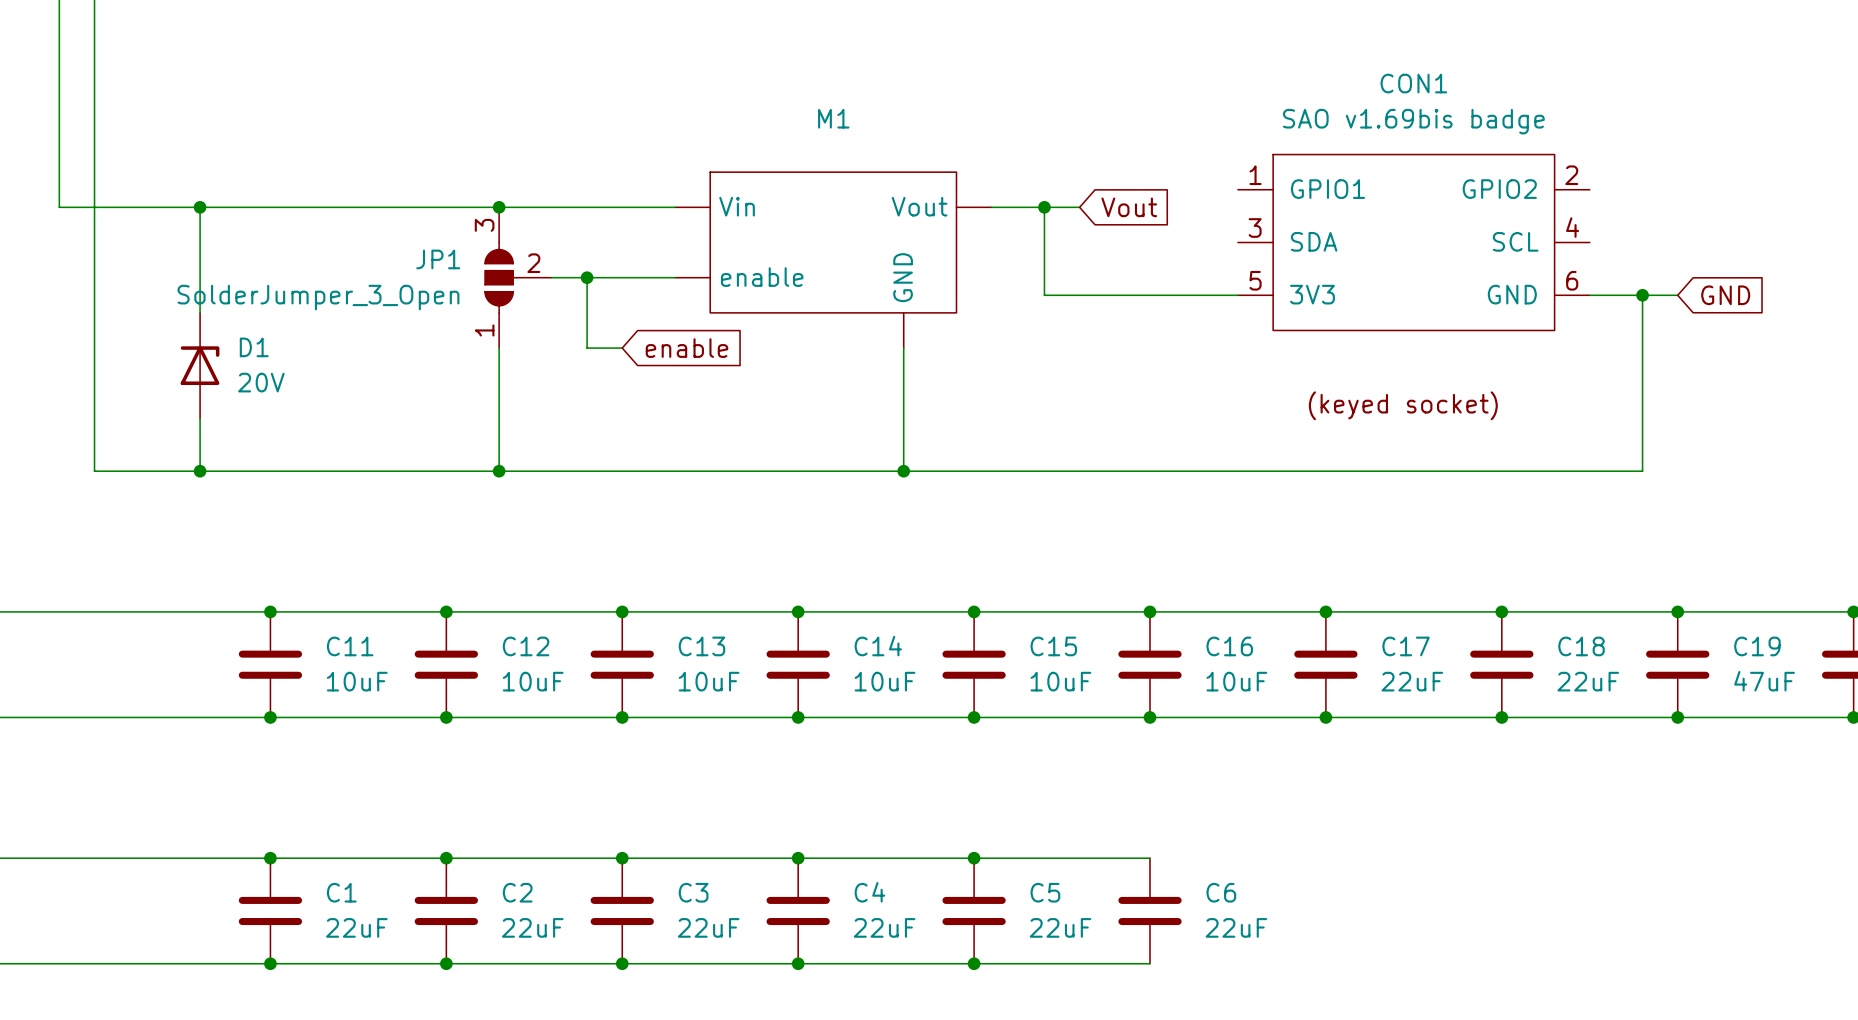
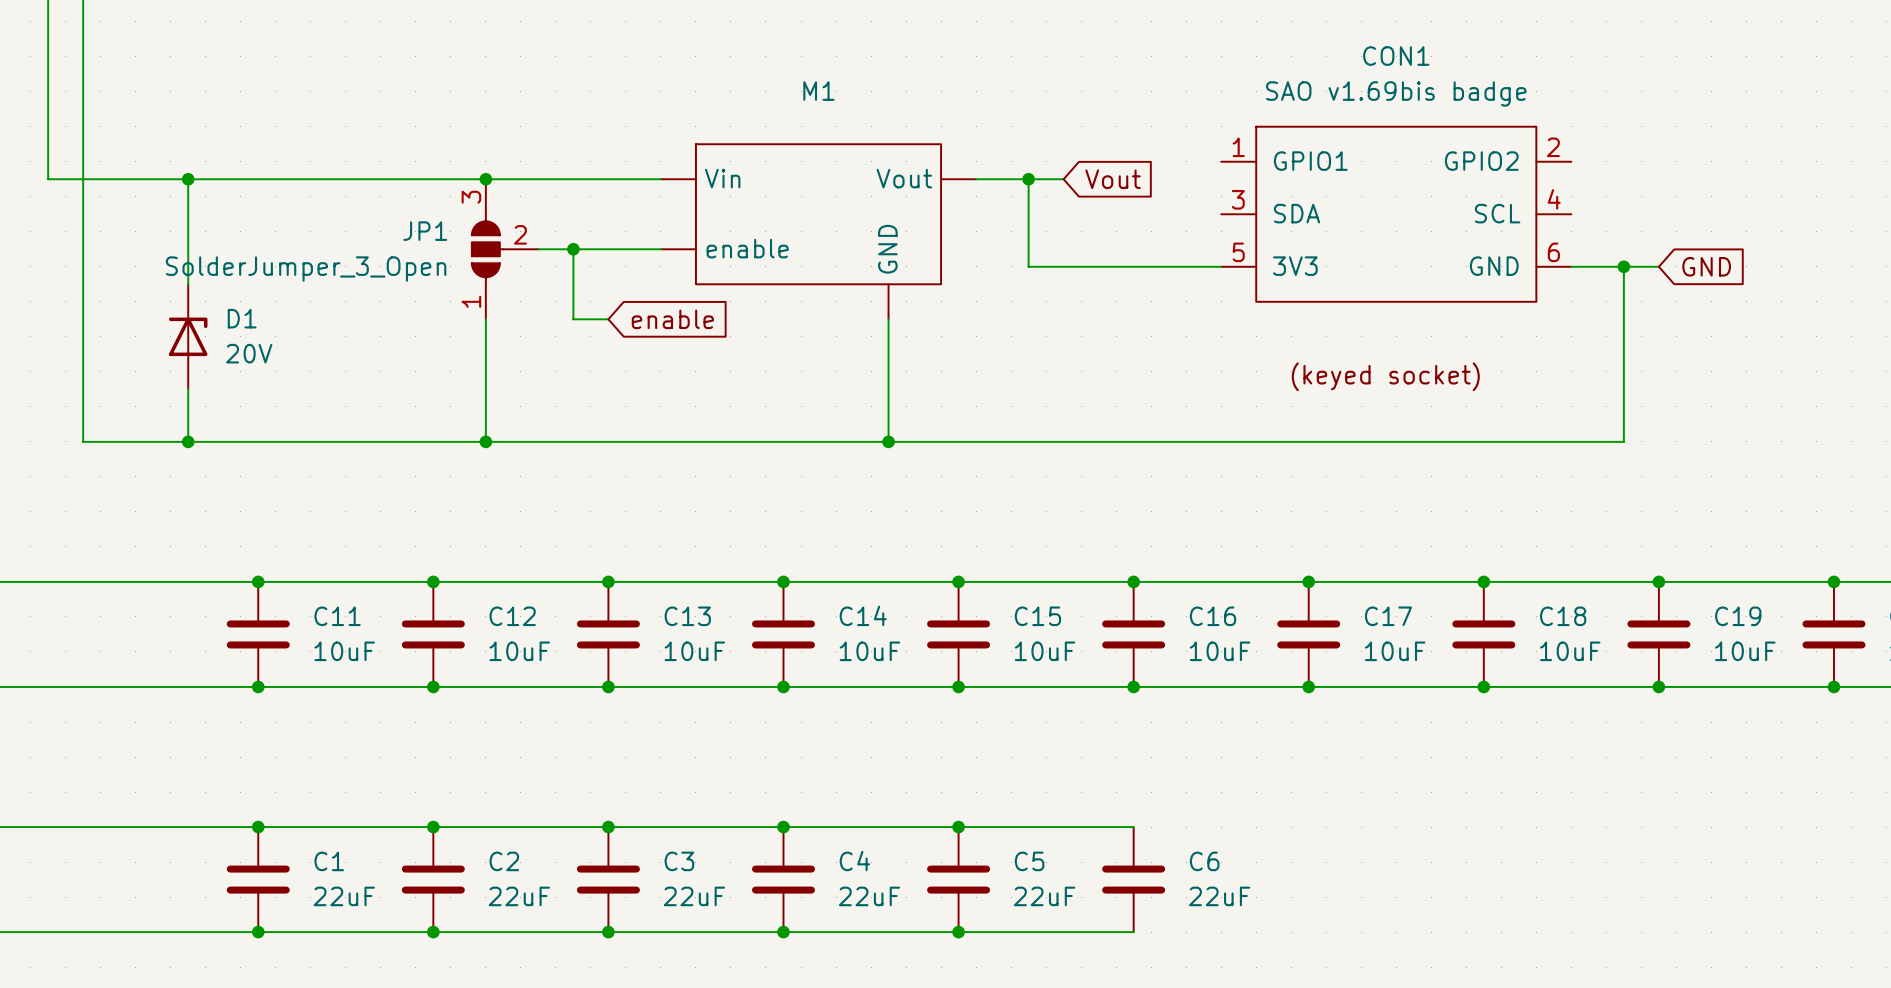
C17 value: 22uF (1412, 681) -> 10uF (1395, 651)
C18 value: 22uF (1588, 681) -> 10uF (1570, 651)
C19 value: 47uF (1764, 681) -> 10uF (1745, 651)

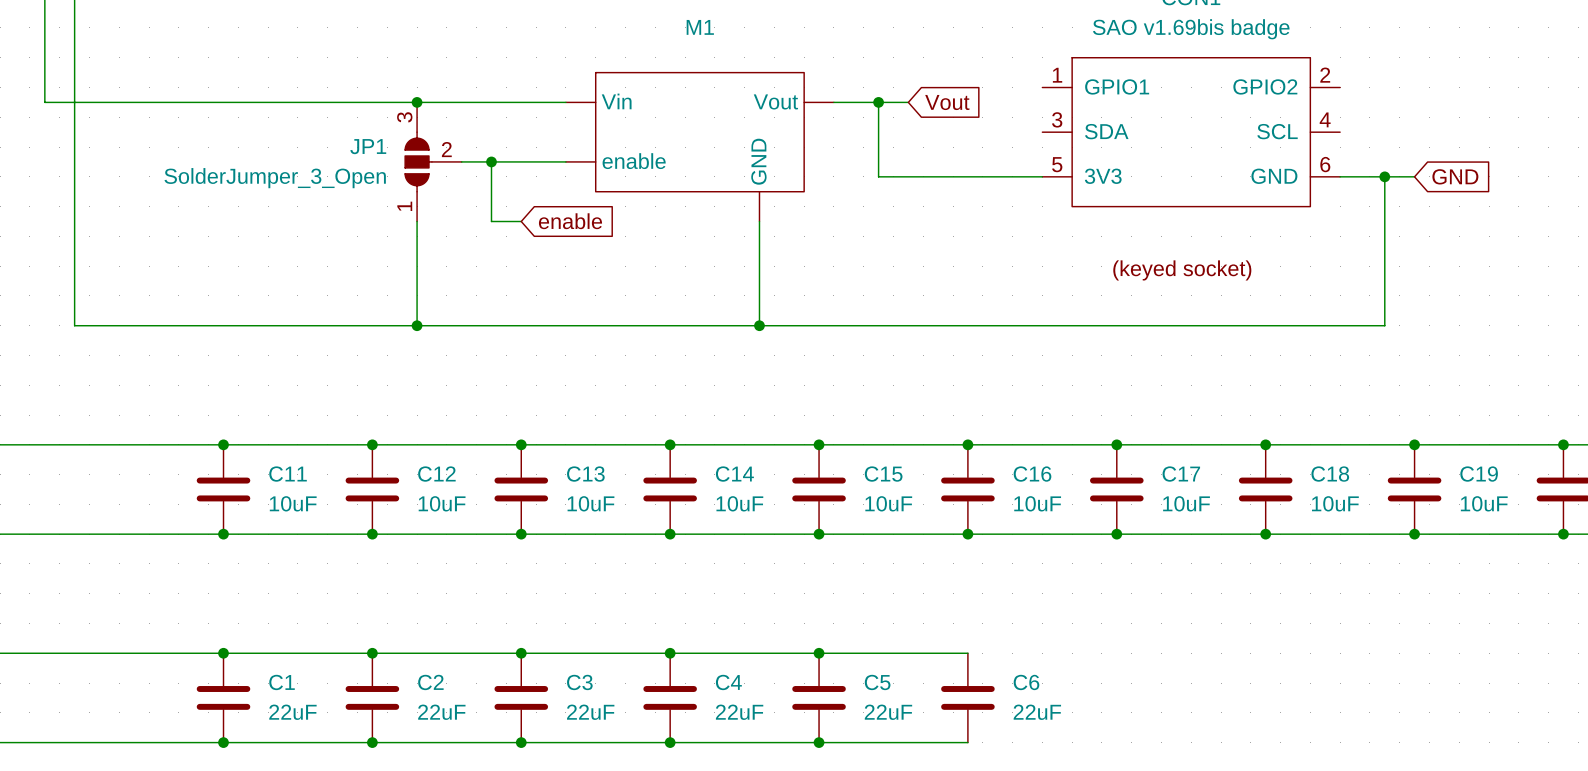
wire: (188, 179) (188, 284) -> none
junction: (188, 179) -> none
D1: 20V (188, 336) -> none
wire: (188, 389) (188, 441) -> none
junction: (188, 441) -> none

